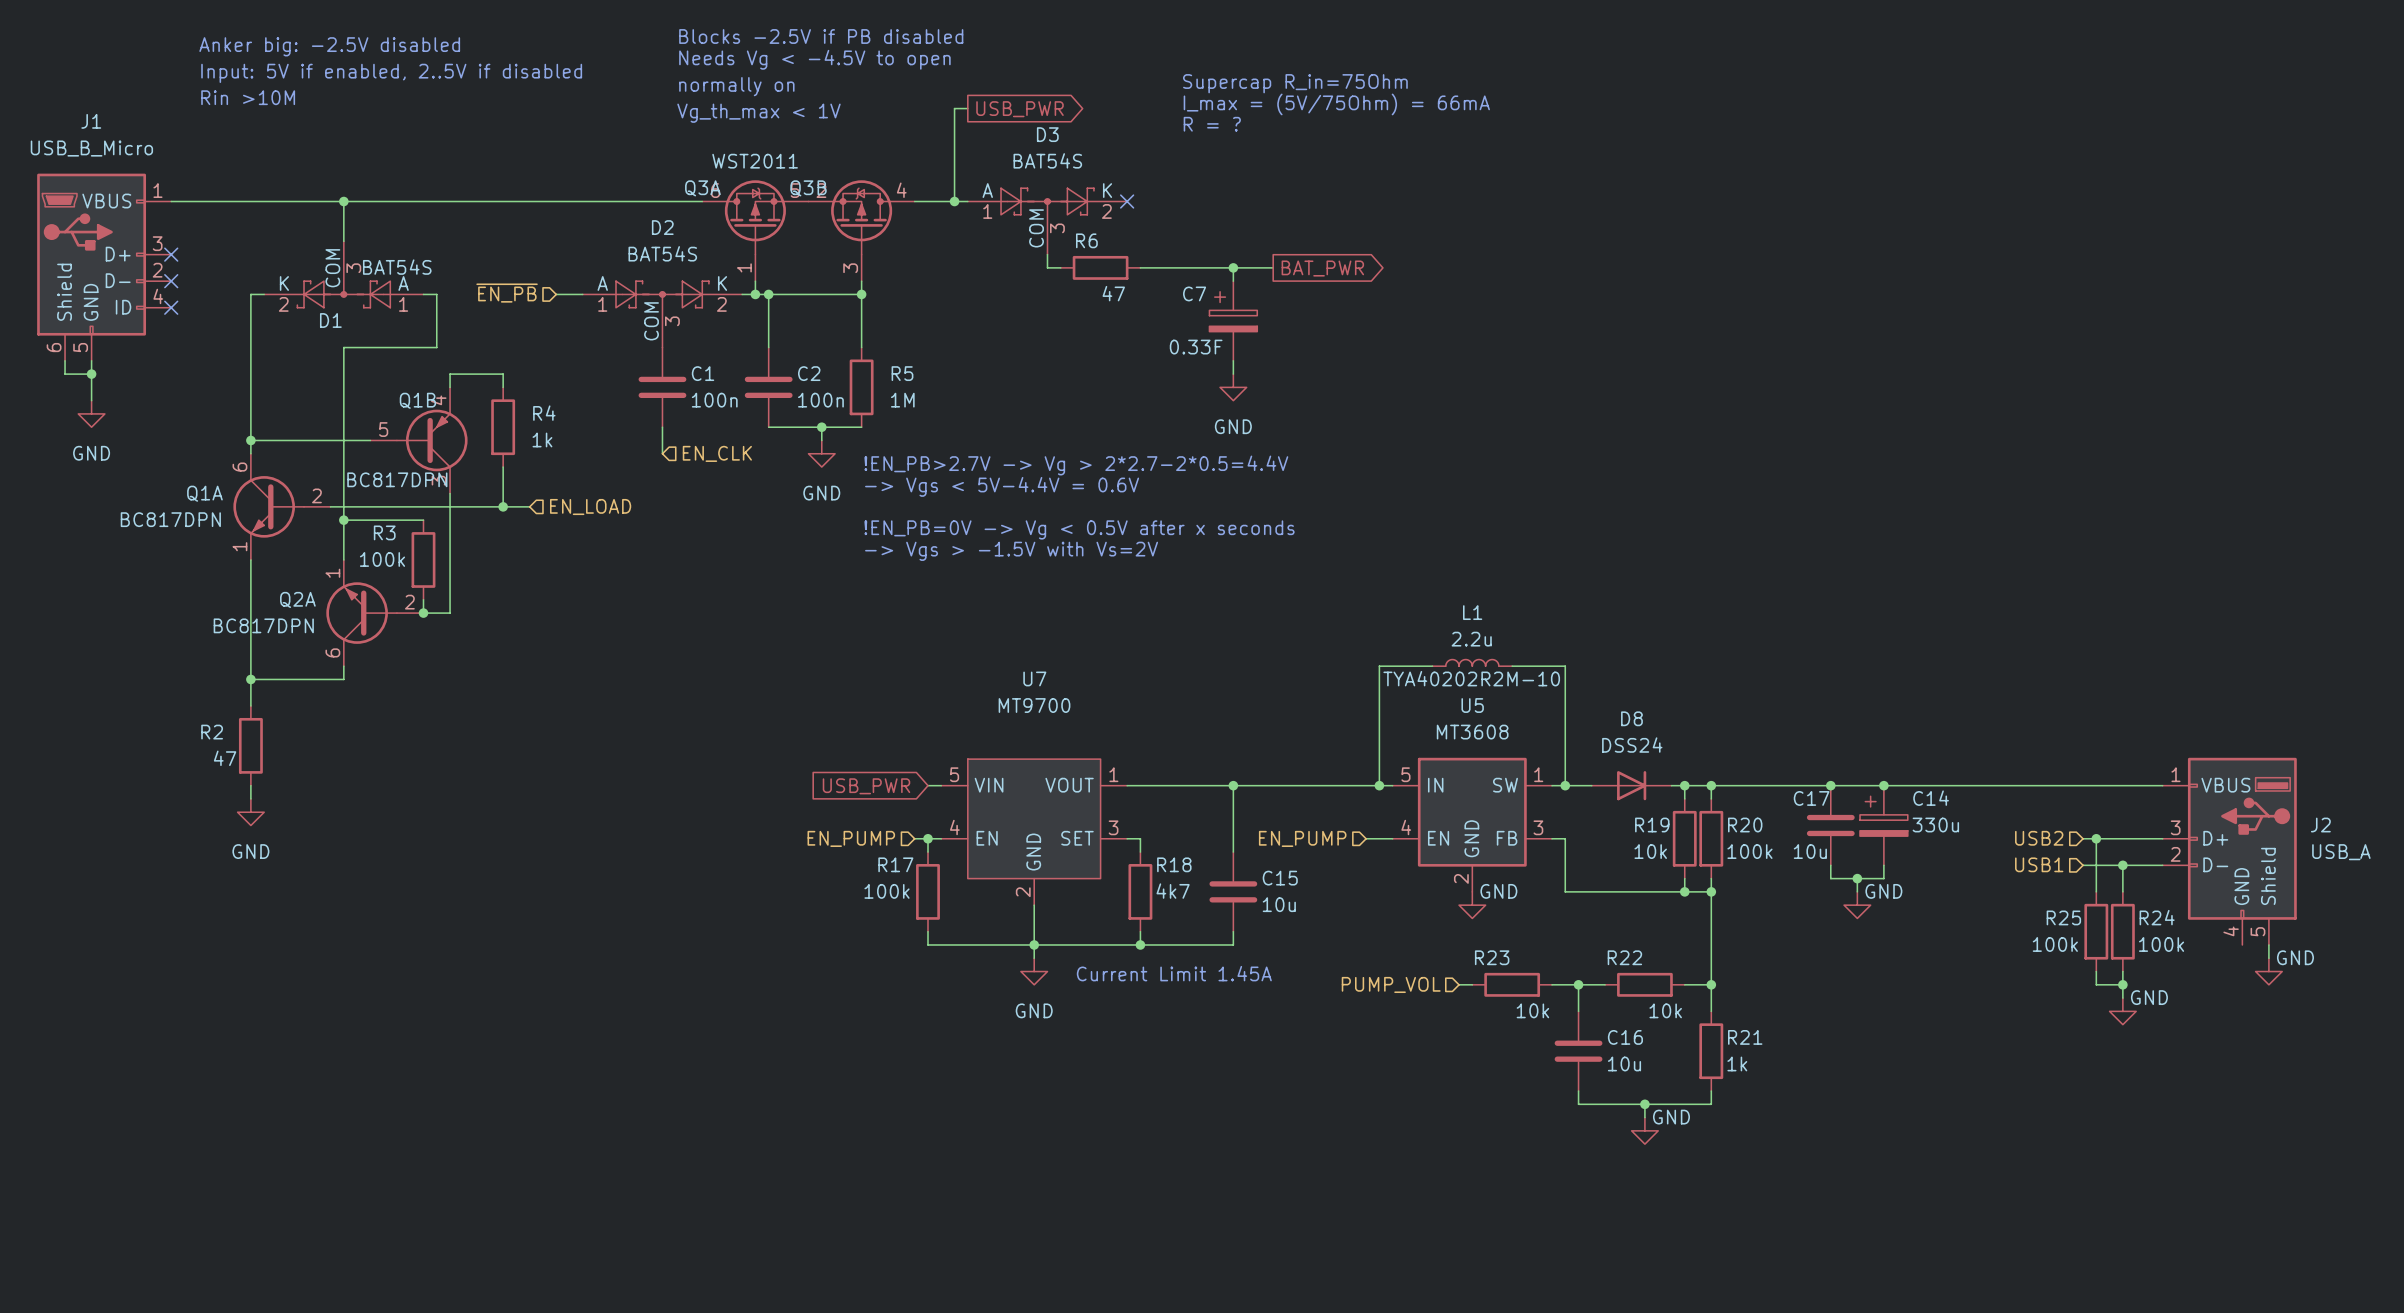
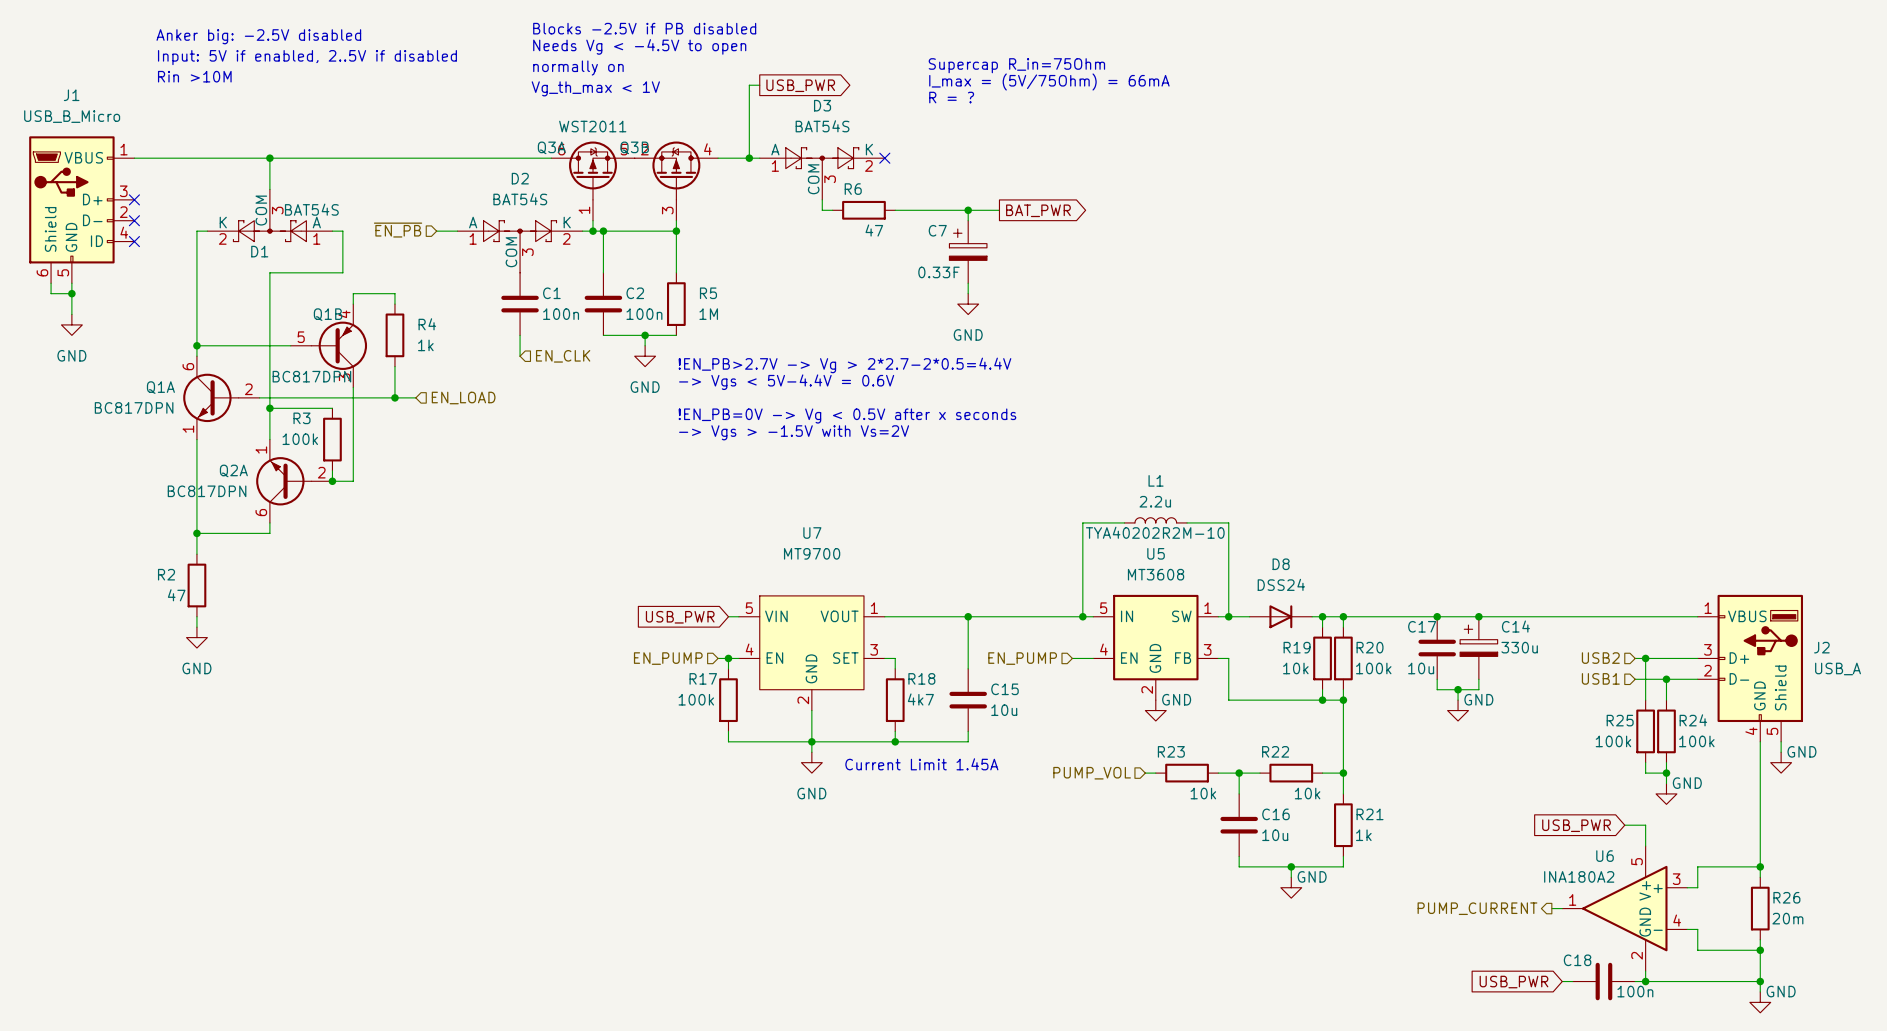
wire: none -> (1760, 741) (1760, 877)
global label: none -> USB_PWR (1576, 825)
wire: none -> (1624, 825) (1645, 825) (1645, 846)
wire: none -> (1760, 866) (1697, 866) (1697, 887) (1687, 887)
junction: none -> (1760, 866)
hierarchical label: none -> PUMP_CURRENT (1477, 908)
wire: none -> (1551, 908) (1562, 908)
U6: none -> INA180A2 (1624, 908)
R26: none -> 20m (1760, 908)
wire: none -> (1687, 929) (1697, 929) (1697, 950) (1760, 950)
wire: none -> (1760, 939) (1760, 991)
junction: none -> (1760, 950)
wire: none -> (1645, 971) (1645, 981)
global label: none -> USB_PWR (1513, 982)
wire: none -> (1562, 981) (1572, 981)
C18: none -> 100n (1603, 981)
wire: none -> (1635, 981) (1760, 981)
junction: none -> (1645, 981)
junction: none -> (1760, 981)
power symbol: none -> GND (1760, 1002)

